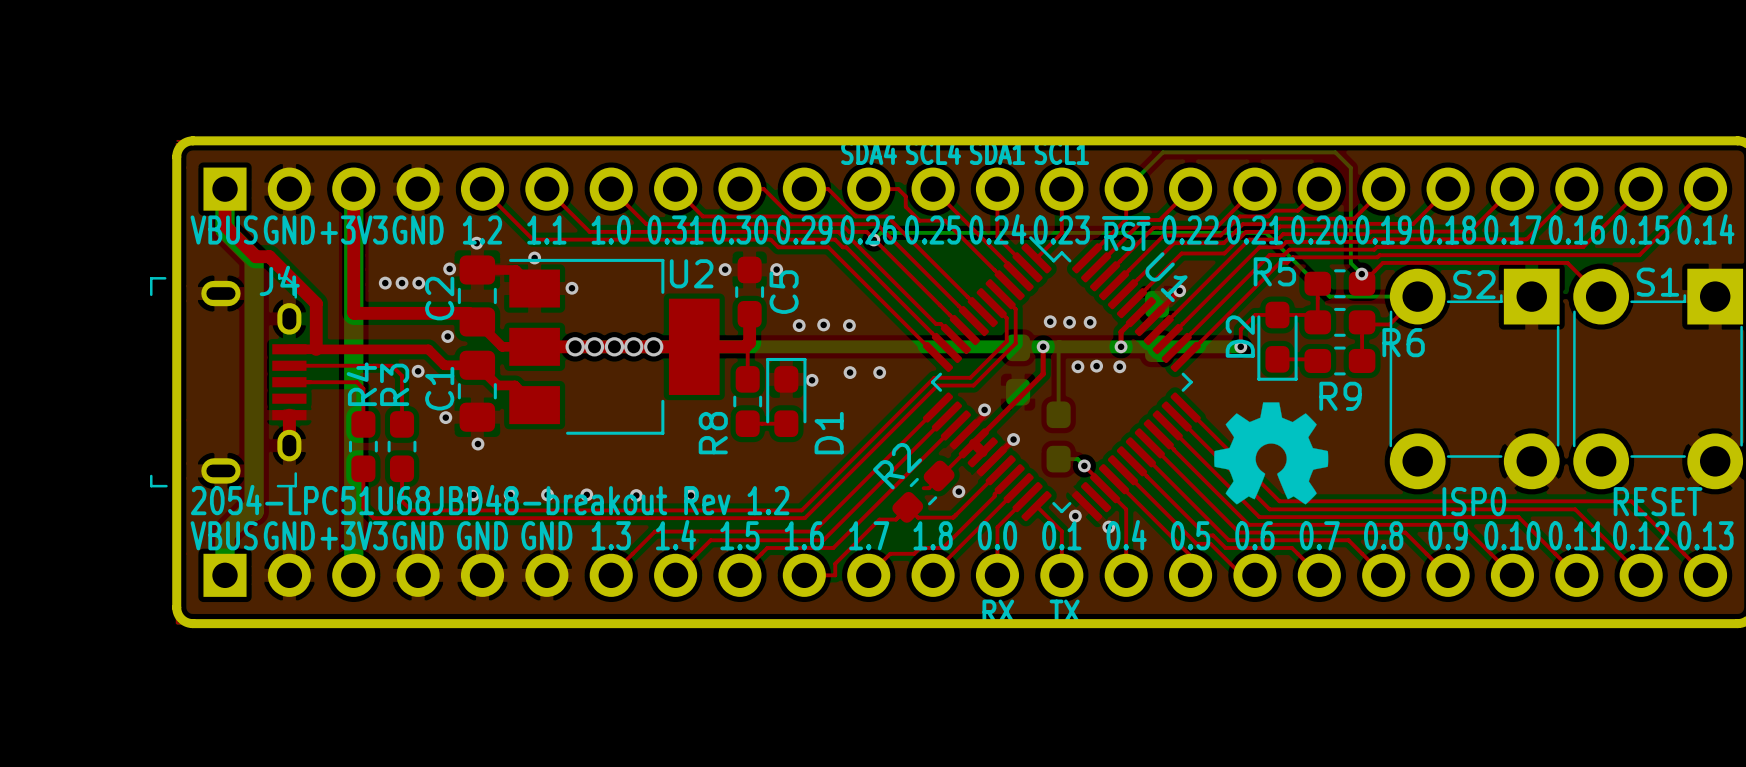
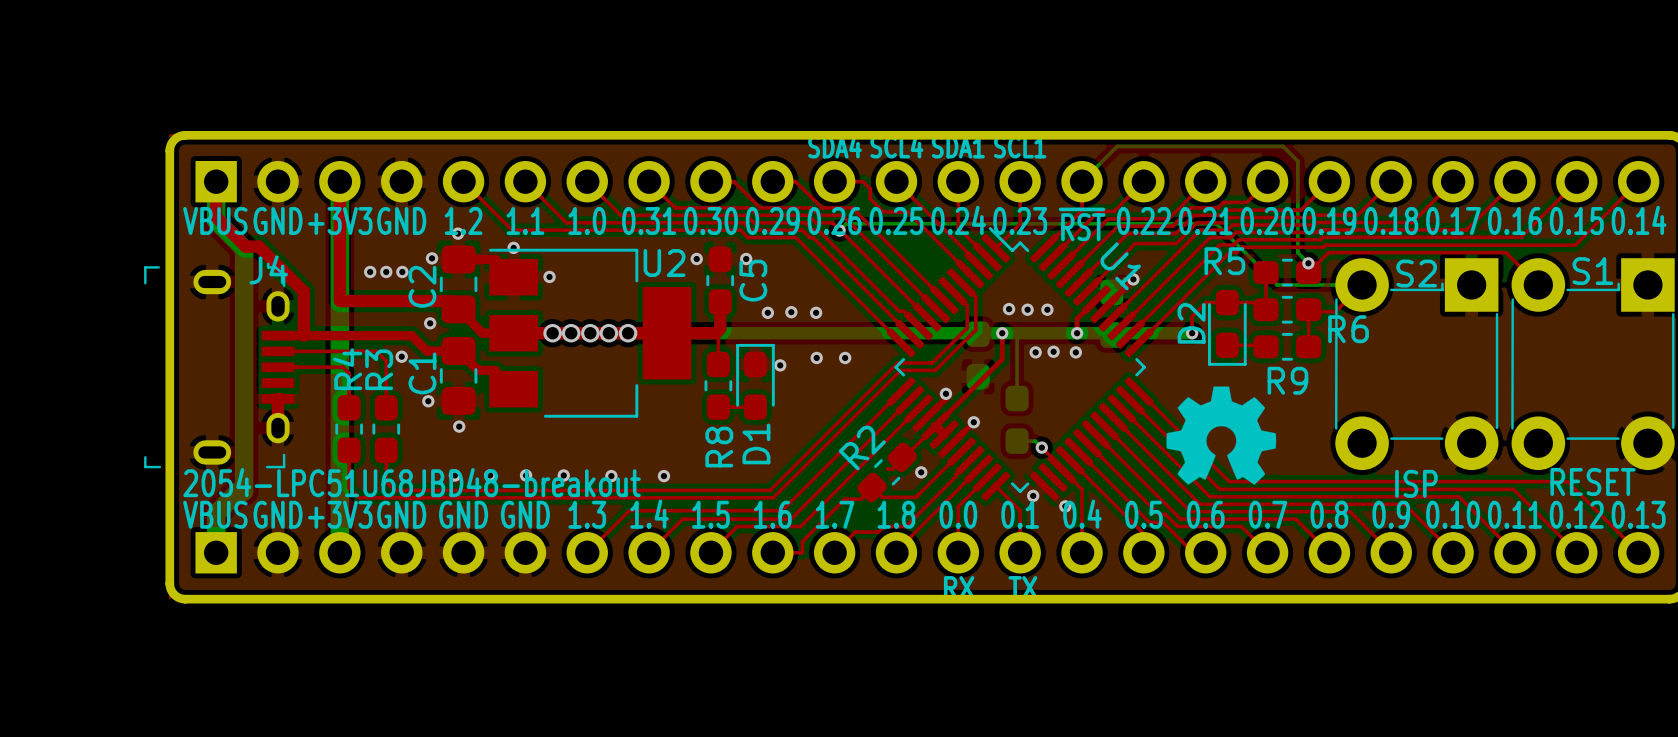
R8 name position: R8 (713, 433) -> R8 (719, 447)
D1 name position: D1 (829, 433) -> D1 (756, 443)
text: 2054-LPC51U68JBD48-breakout Rev 1.2 (490, 500) -> 2054-LPC51U68JBD48-breakout (412, 482)
text: ISP0 (1474, 501) -> ISP (1416, 483)

